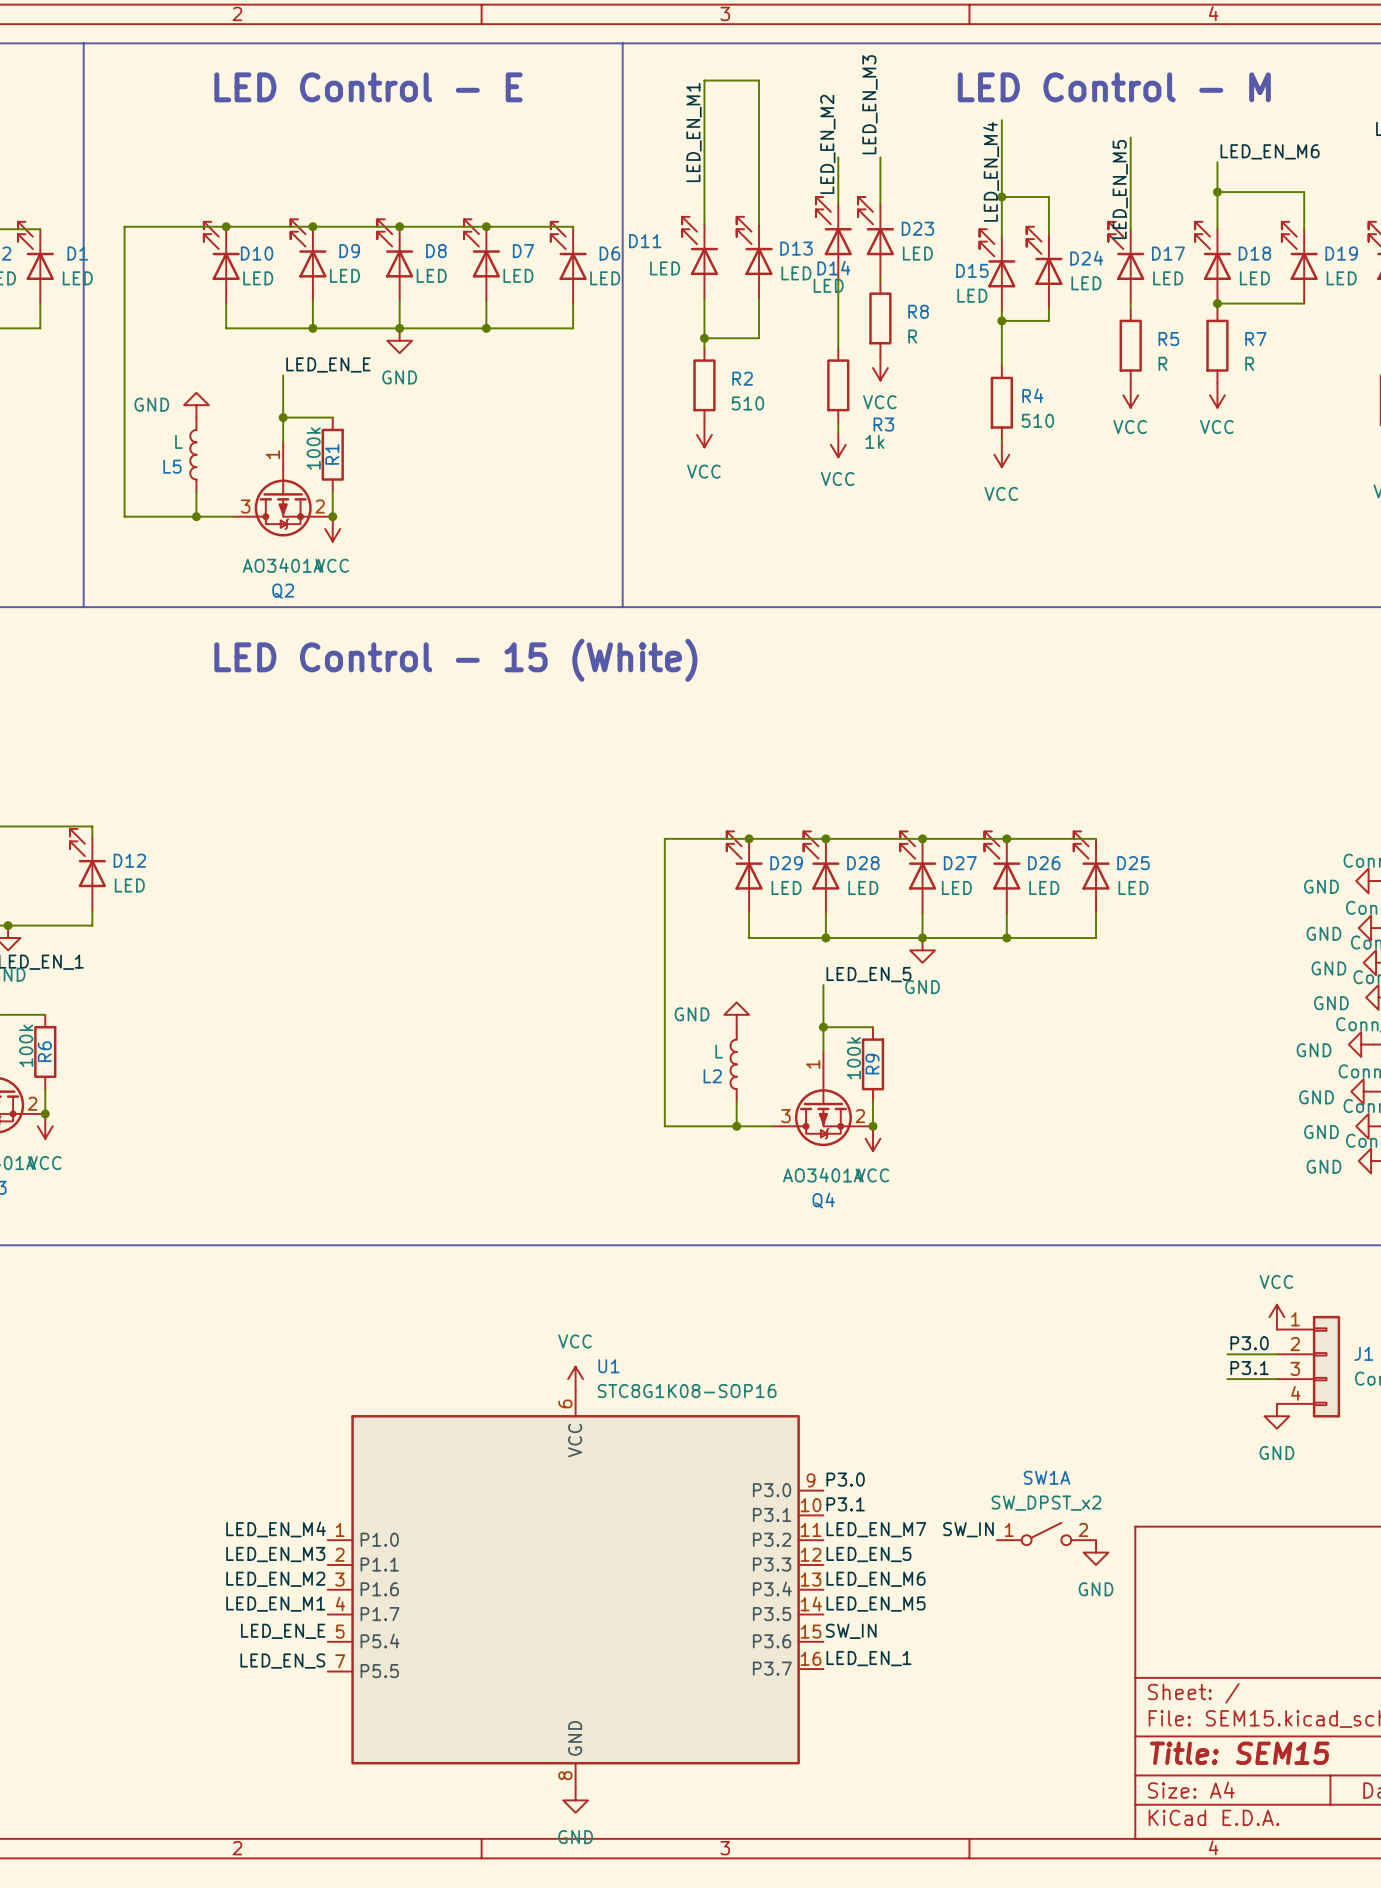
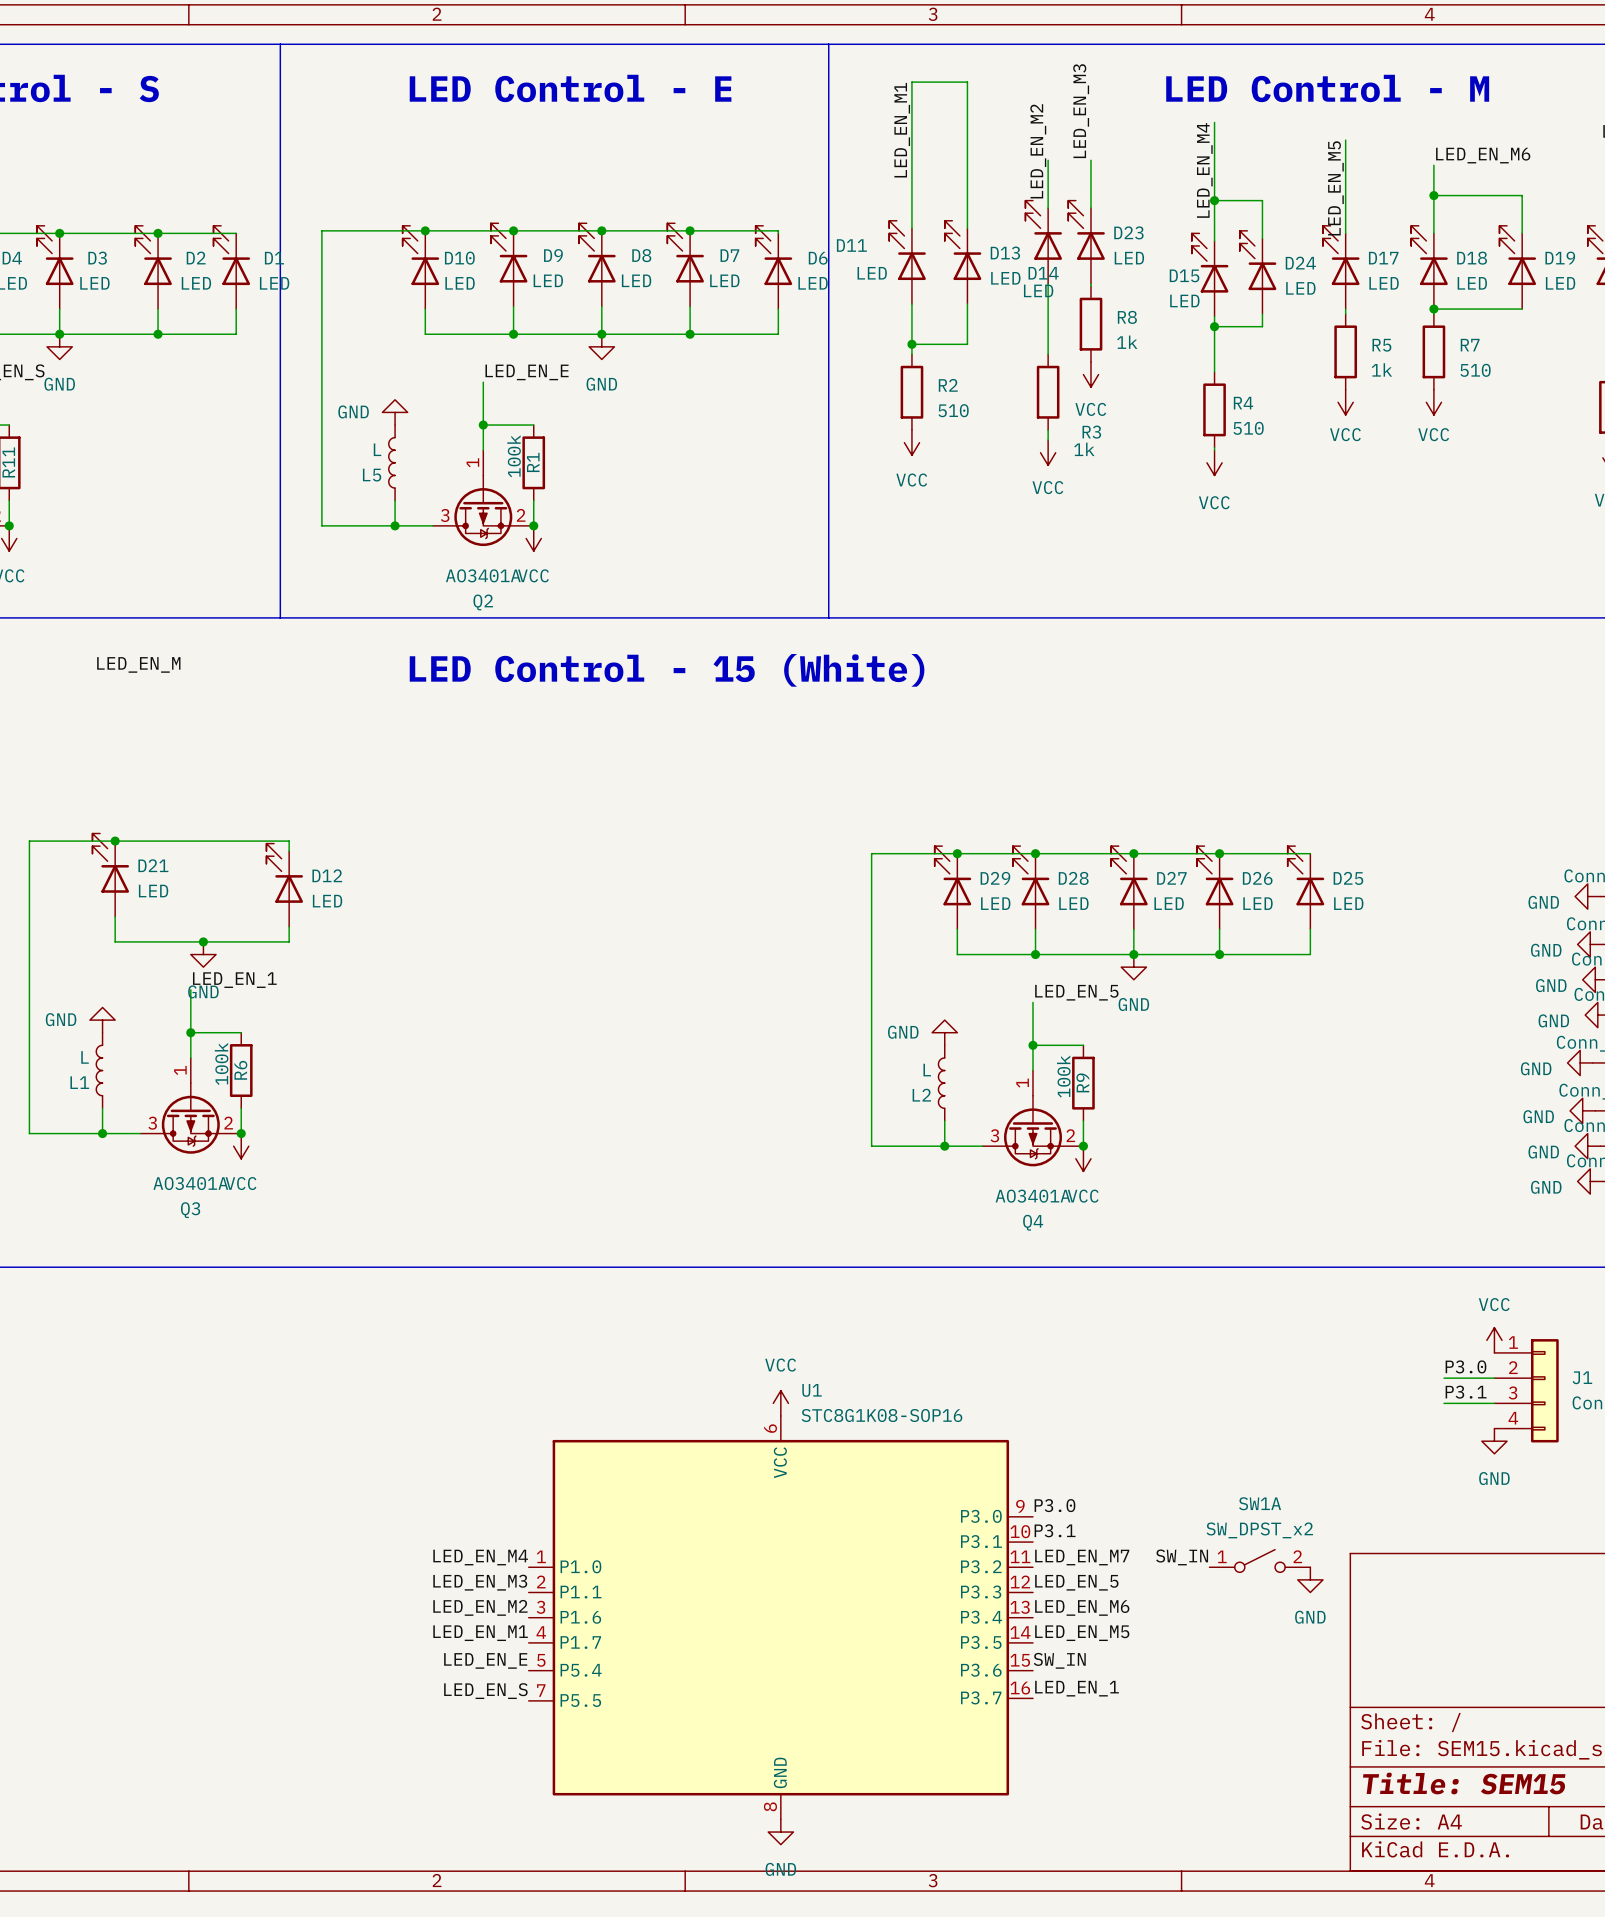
R8 value: R (912, 336) -> 1k (1127, 342)
R5 value: R (1162, 363) -> 1k (1381, 369)
R7 value: R (1249, 363) -> 510 (1475, 370)

